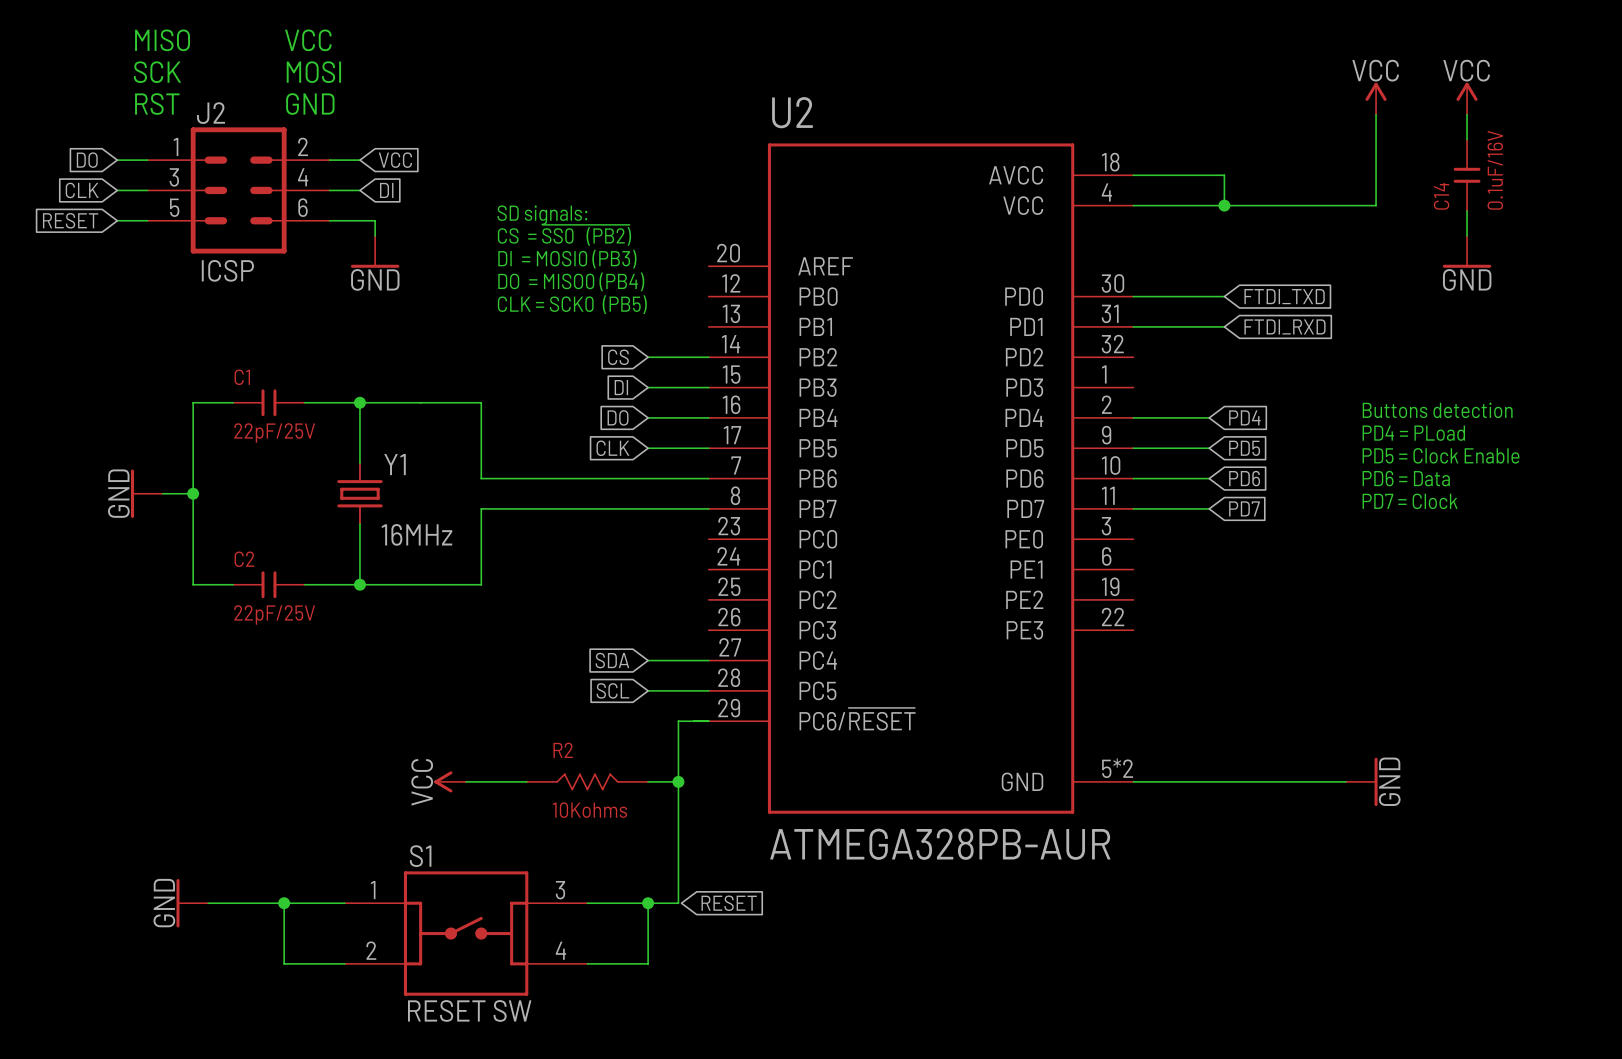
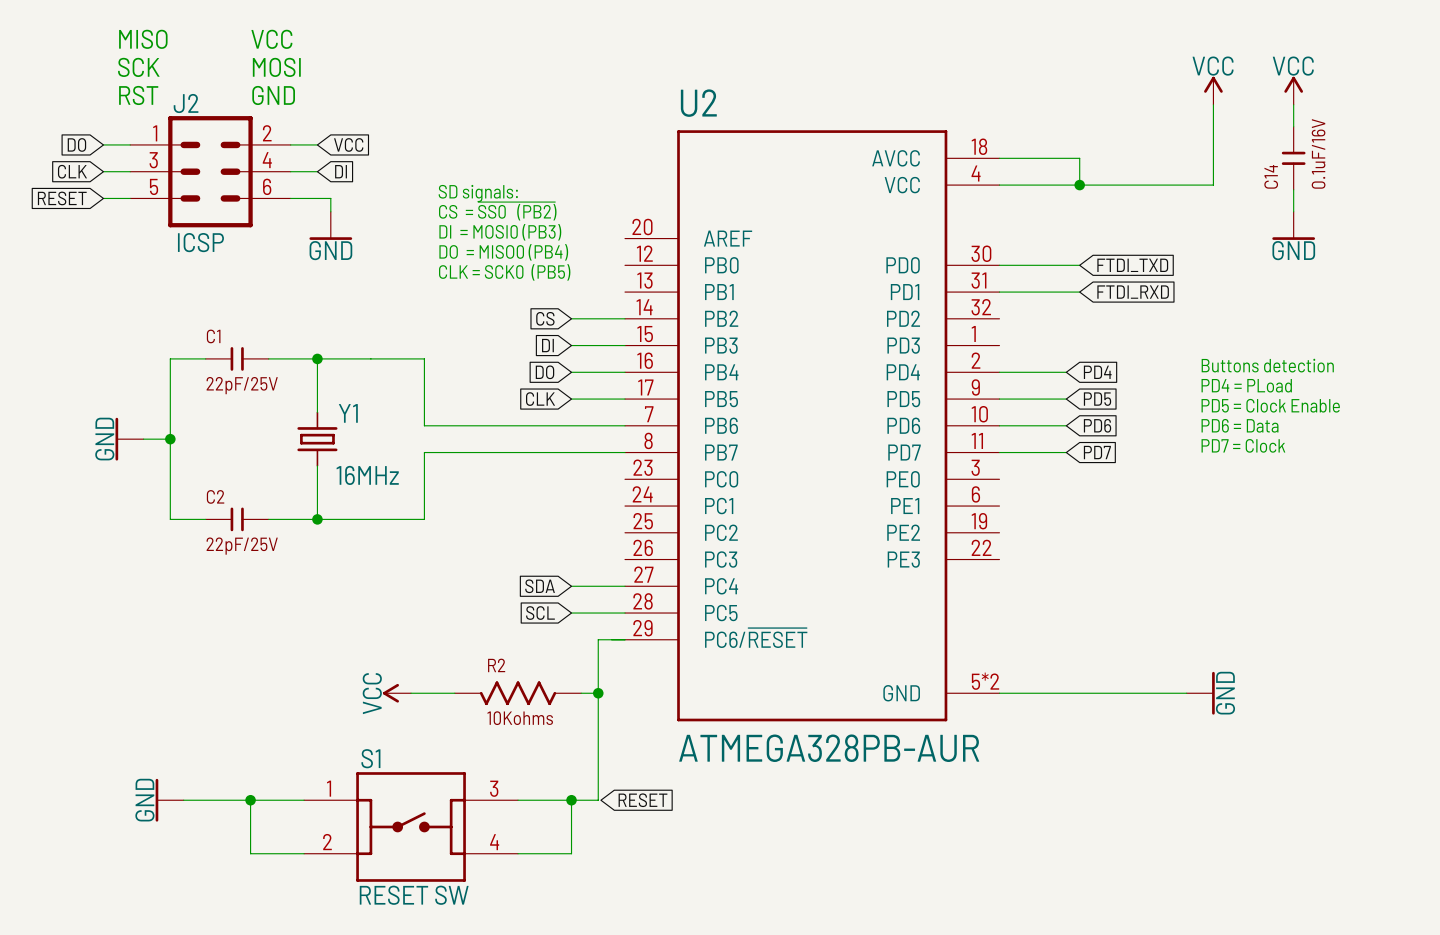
R2 symbol: [526, 773, 649, 791] -> [454, 681, 582, 706]

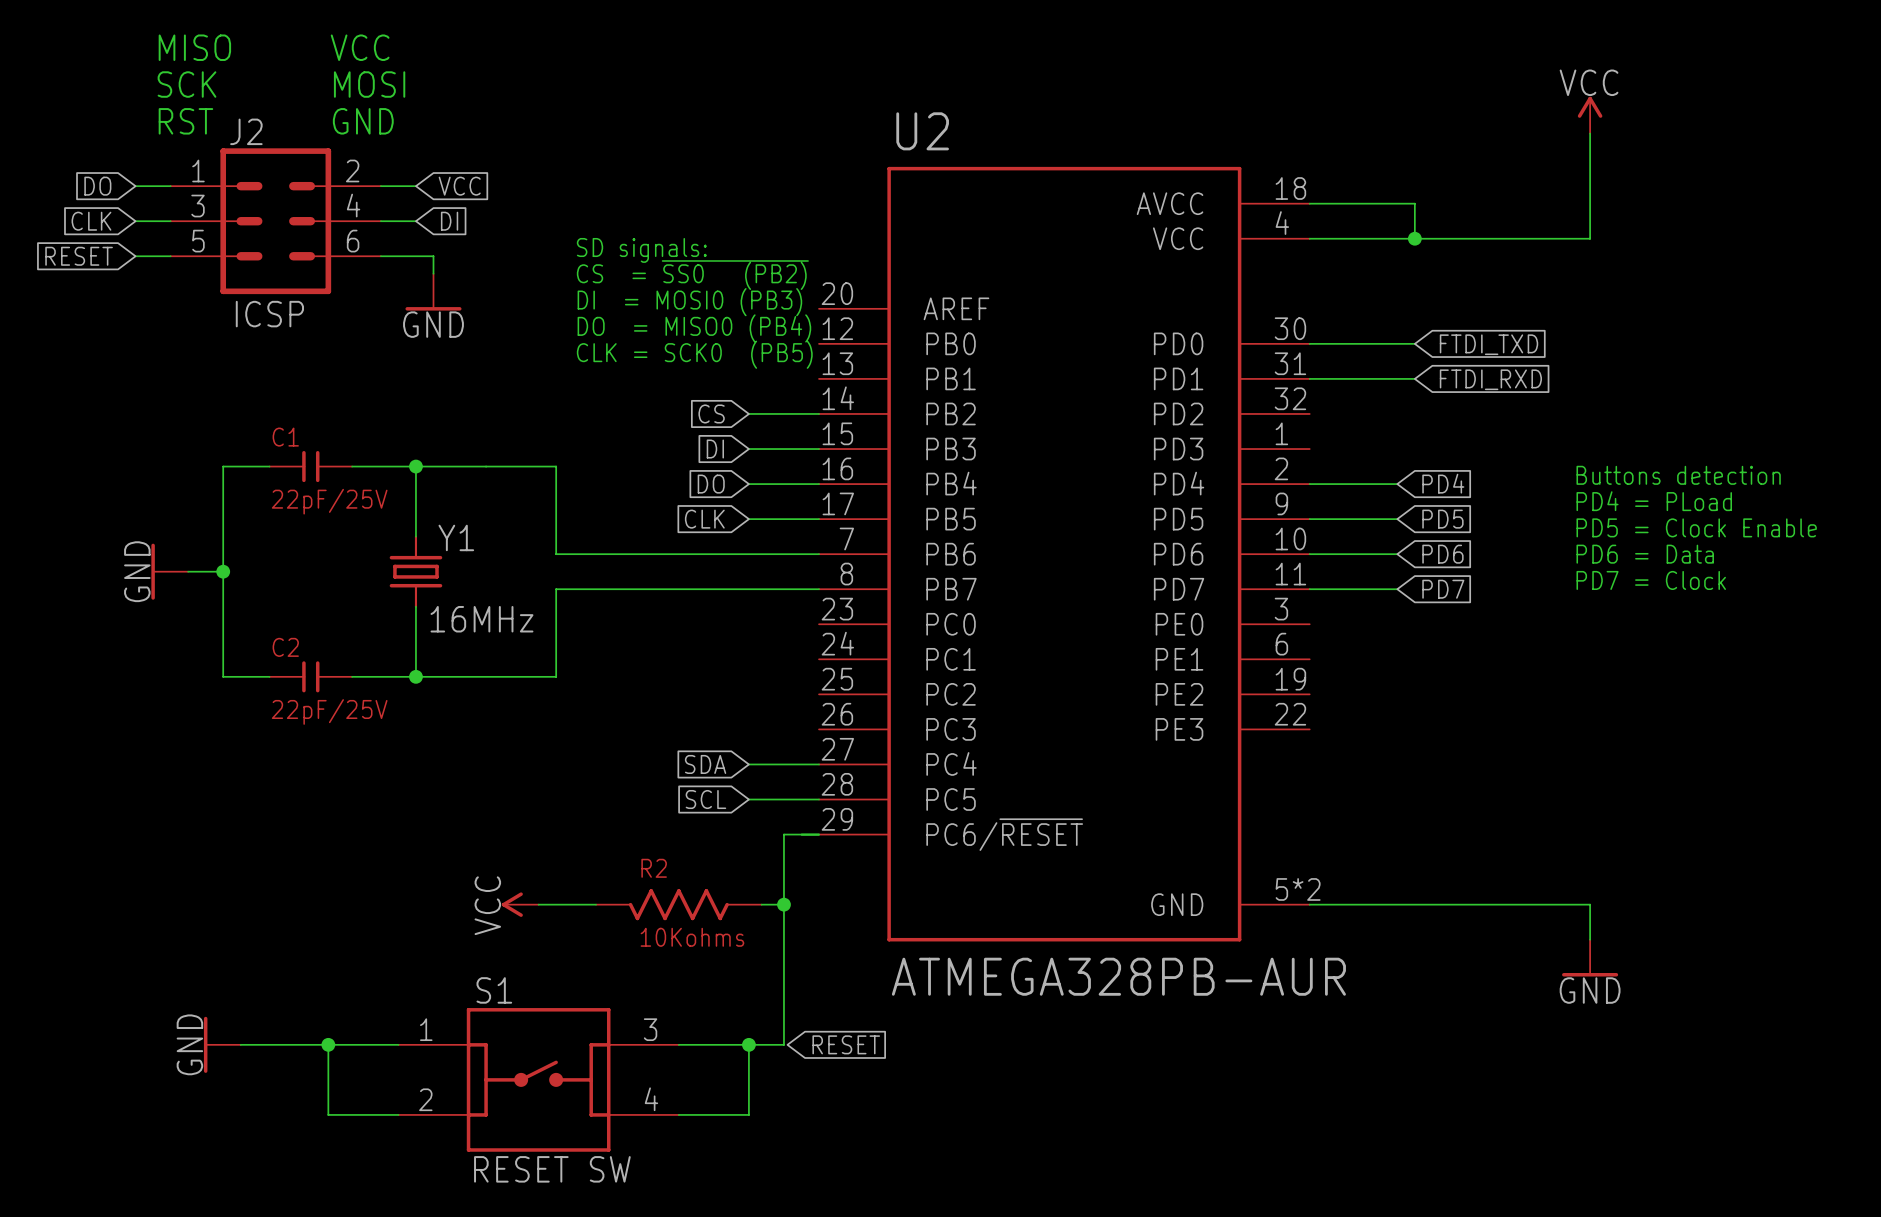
power symbol: VCC (1293, 90) -> none
wire: (1293, 104) (1293, 126) -> none
C14: 0.1uF/16V (1293, 158) -> none
wire: (1293, 189) (1293, 211) -> none
power symbol: GND (1293, 225) -> none
power symbol position: GND (1200, 693) -> GND (1590, 958)
power symbol rotation: 0° (1213, 693) -> 90° clockwise (1590, 974)

